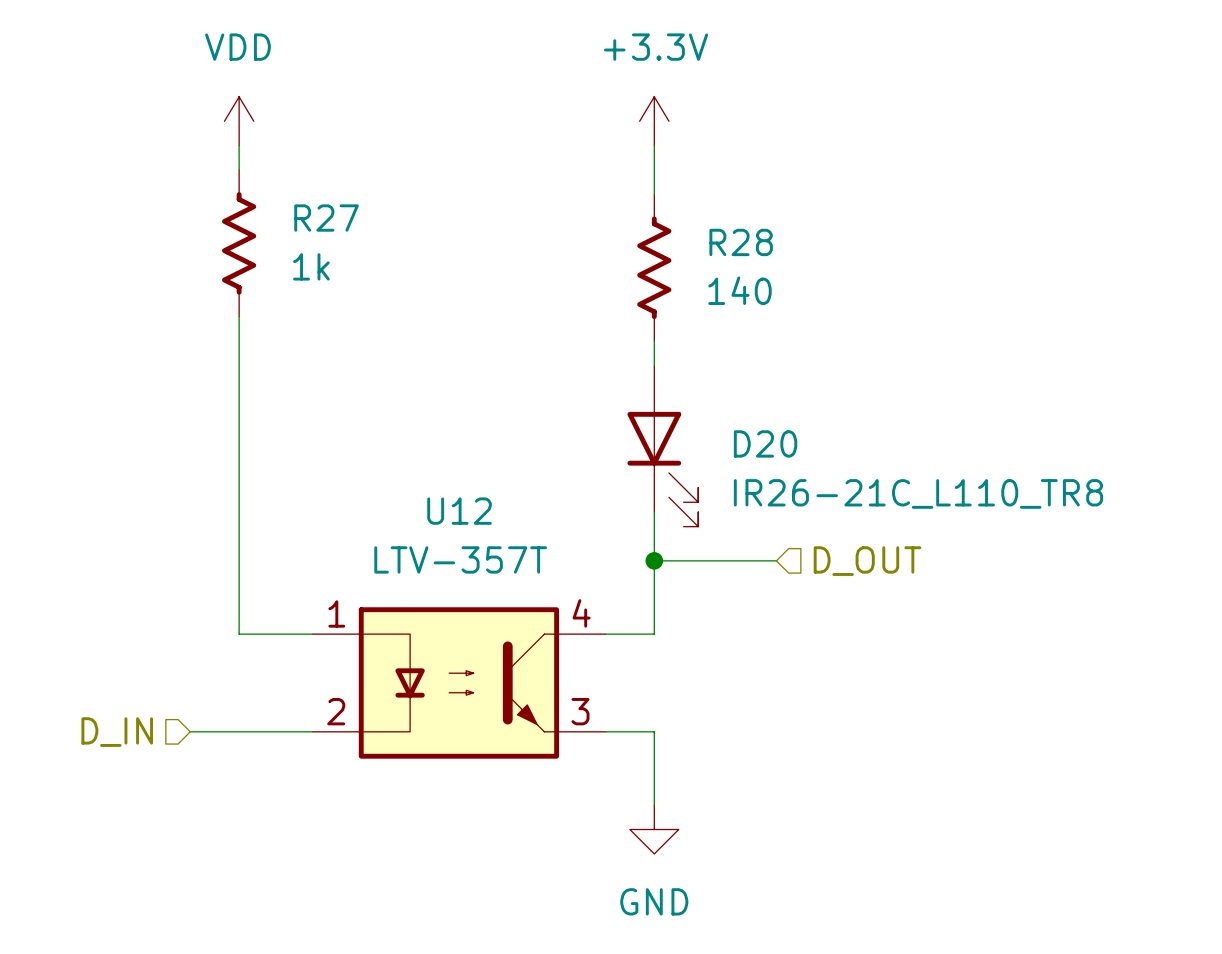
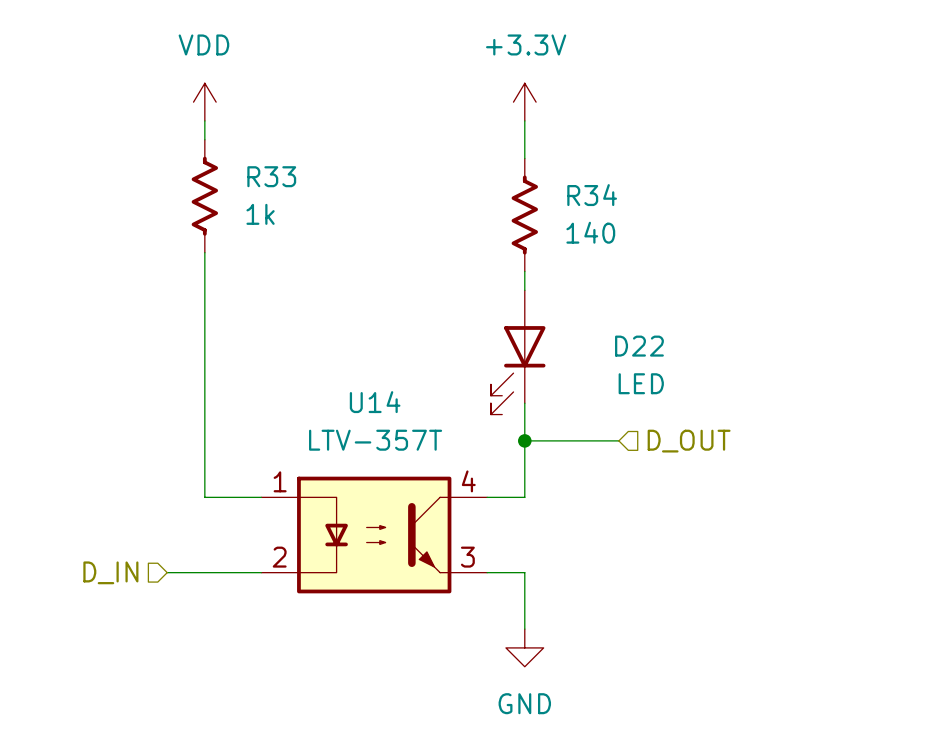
R27 name: R27 (326, 218) -> R33 (271, 176)
R28 name: R28 (741, 242) -> R34 (592, 195)
D22: none -> LED (518, 352)
D20: IR26-21C_L110_TR8 (662, 446) -> none
U12 name: U12 (459, 511) -> U14 (375, 402)

